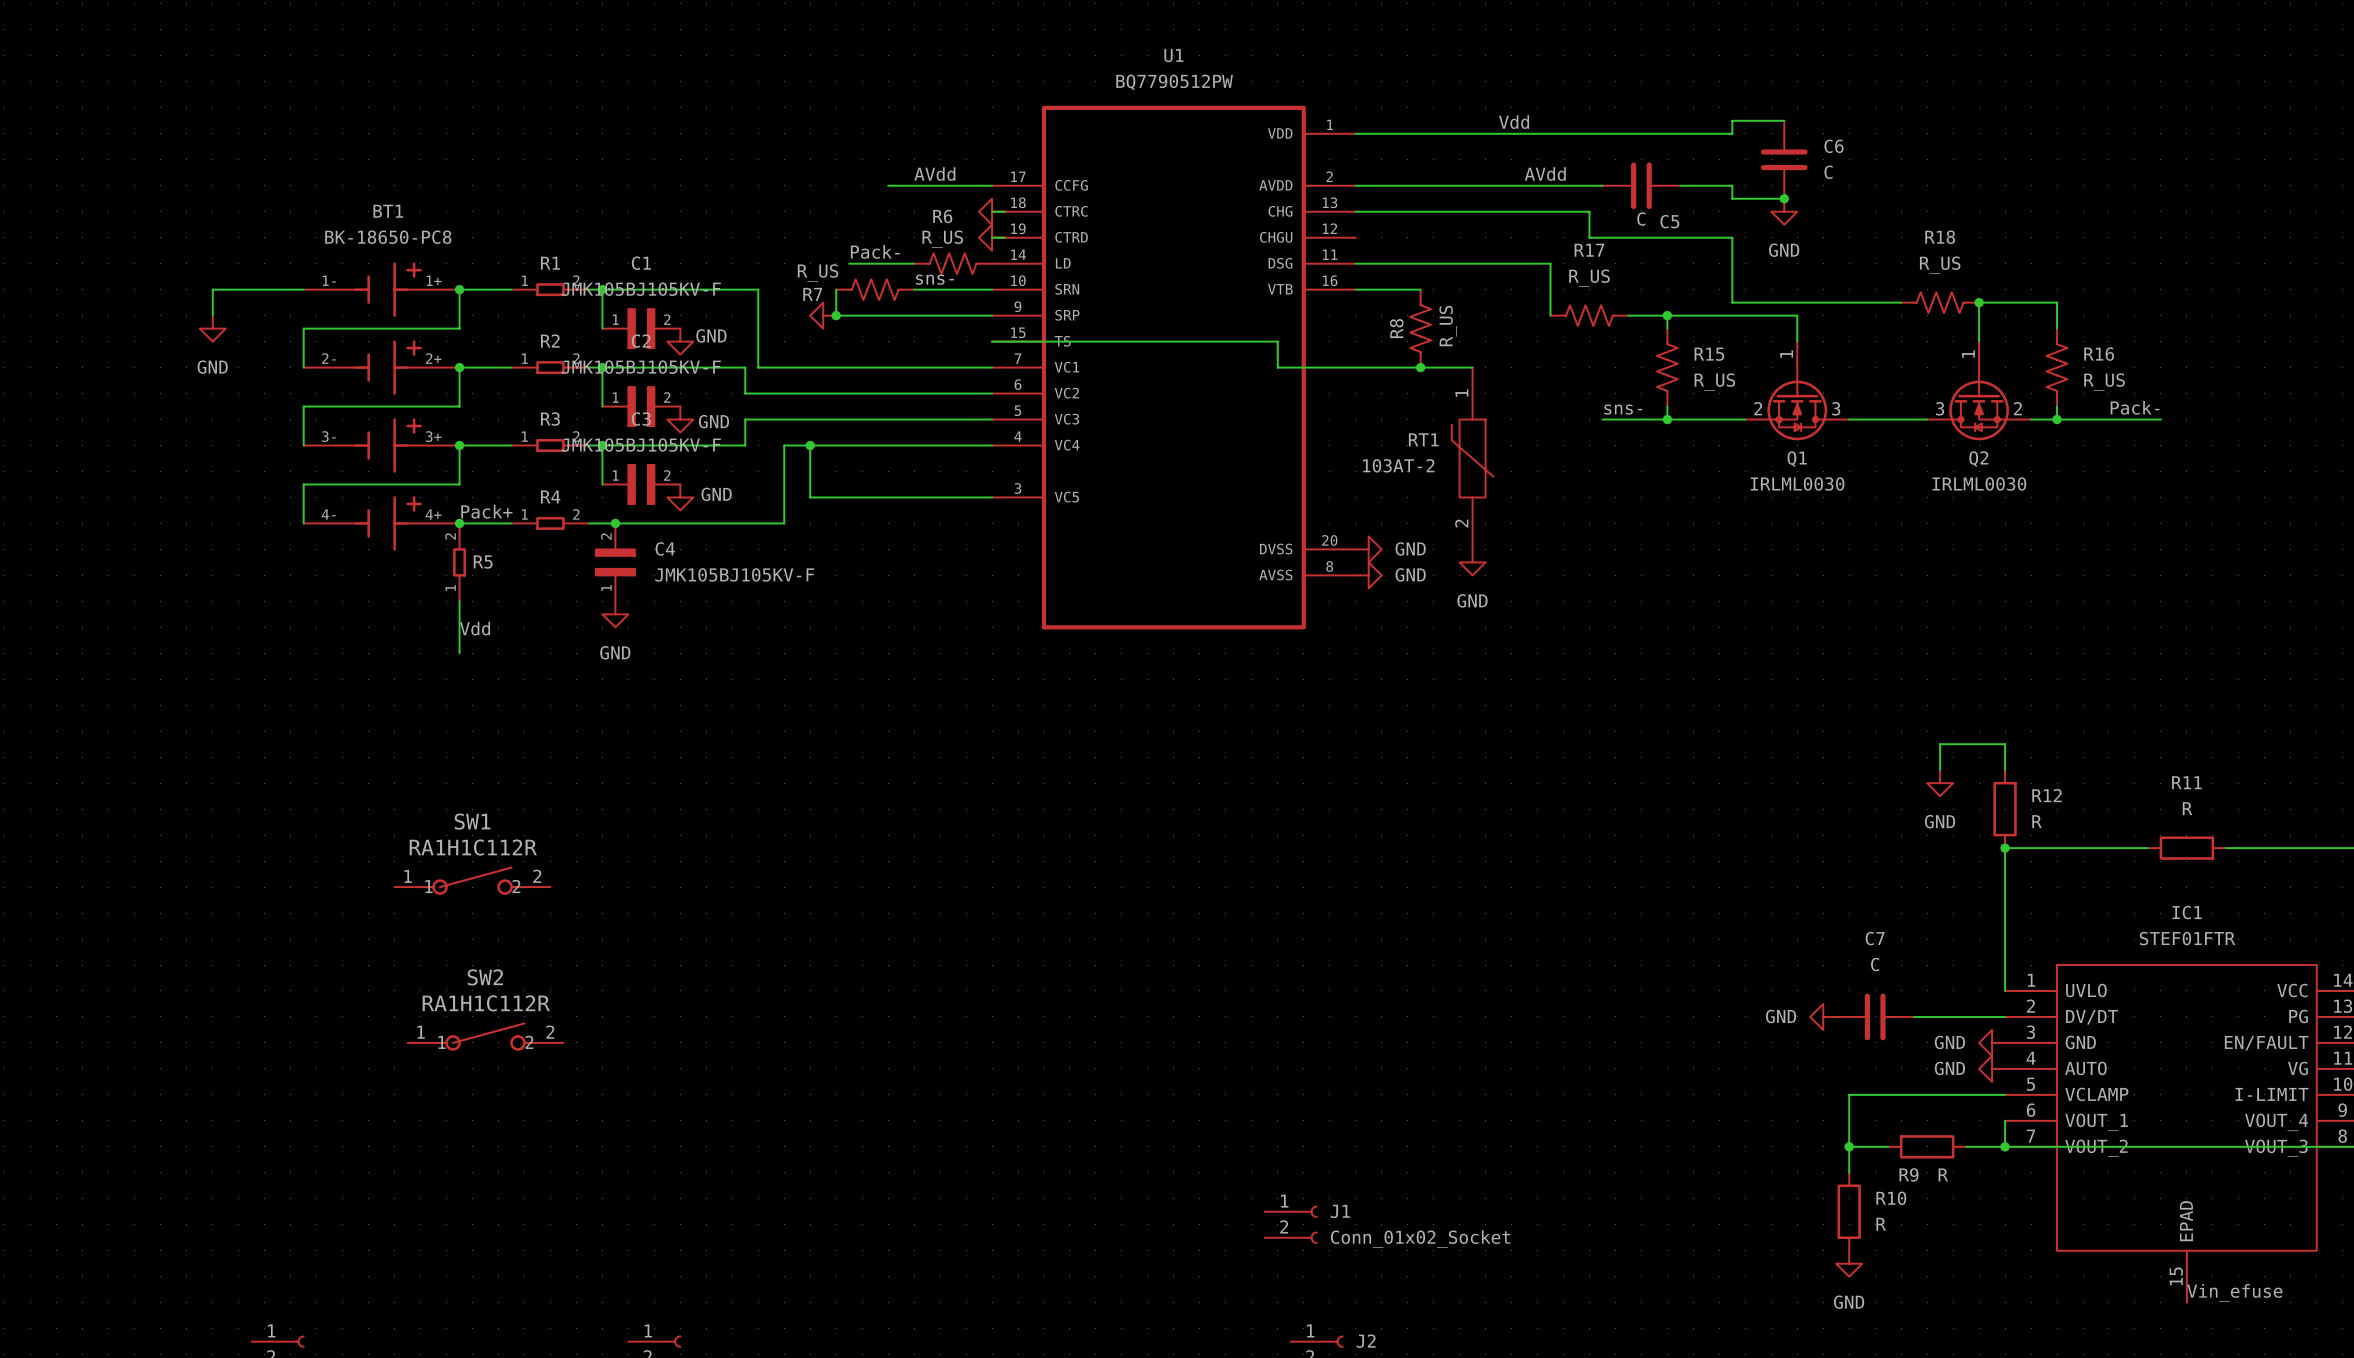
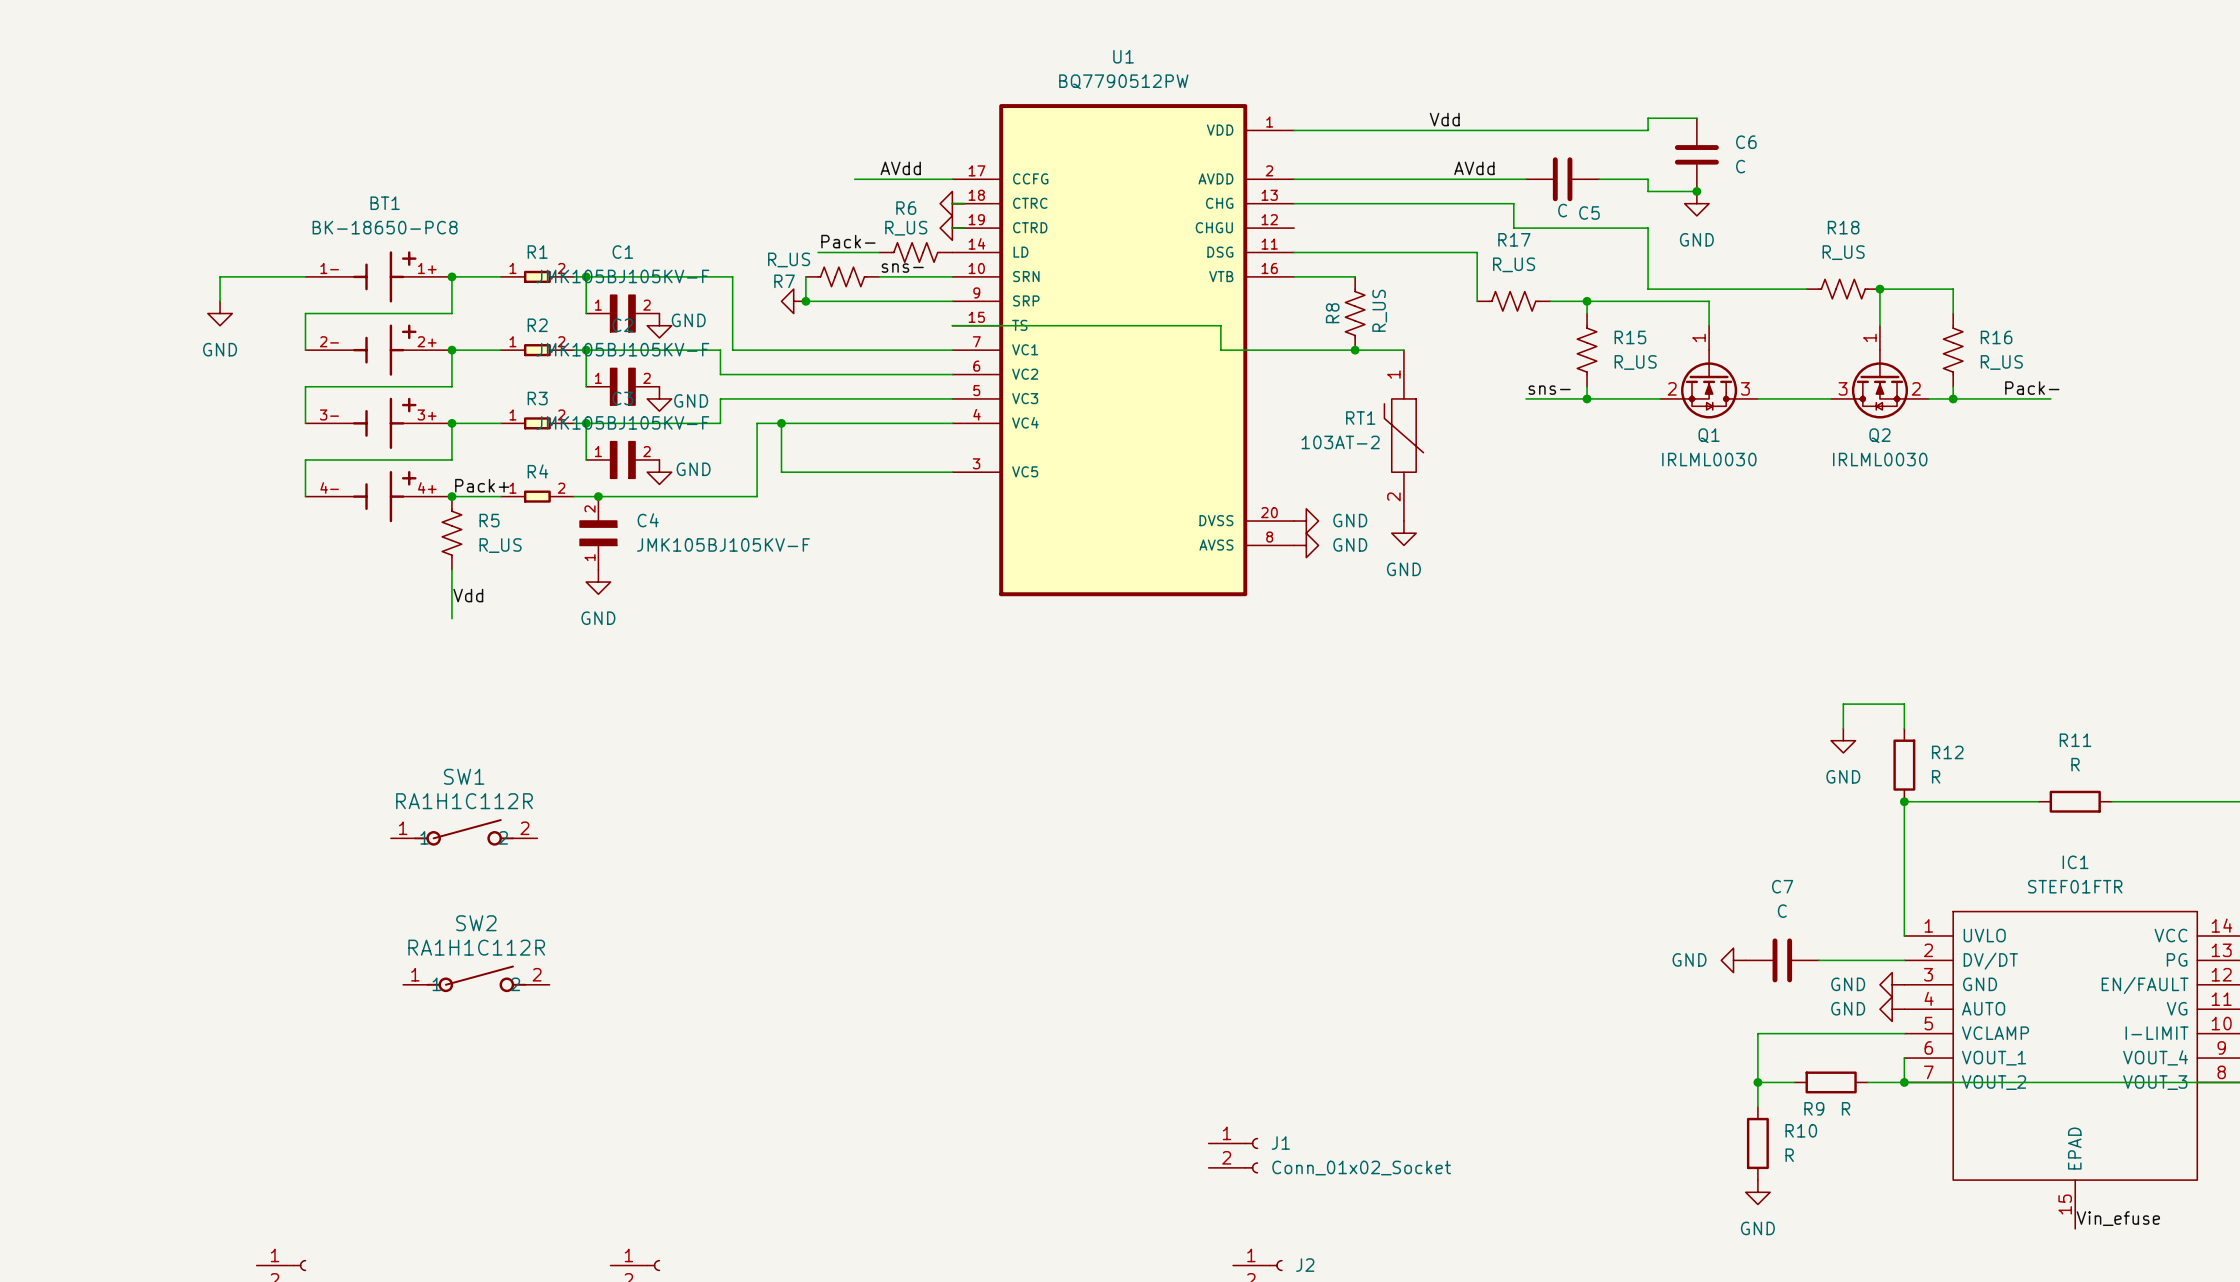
R5 symbol: [453, 523, 467, 602] -> [442, 496, 462, 570]
R5 value: none -> R_US (500, 545)

